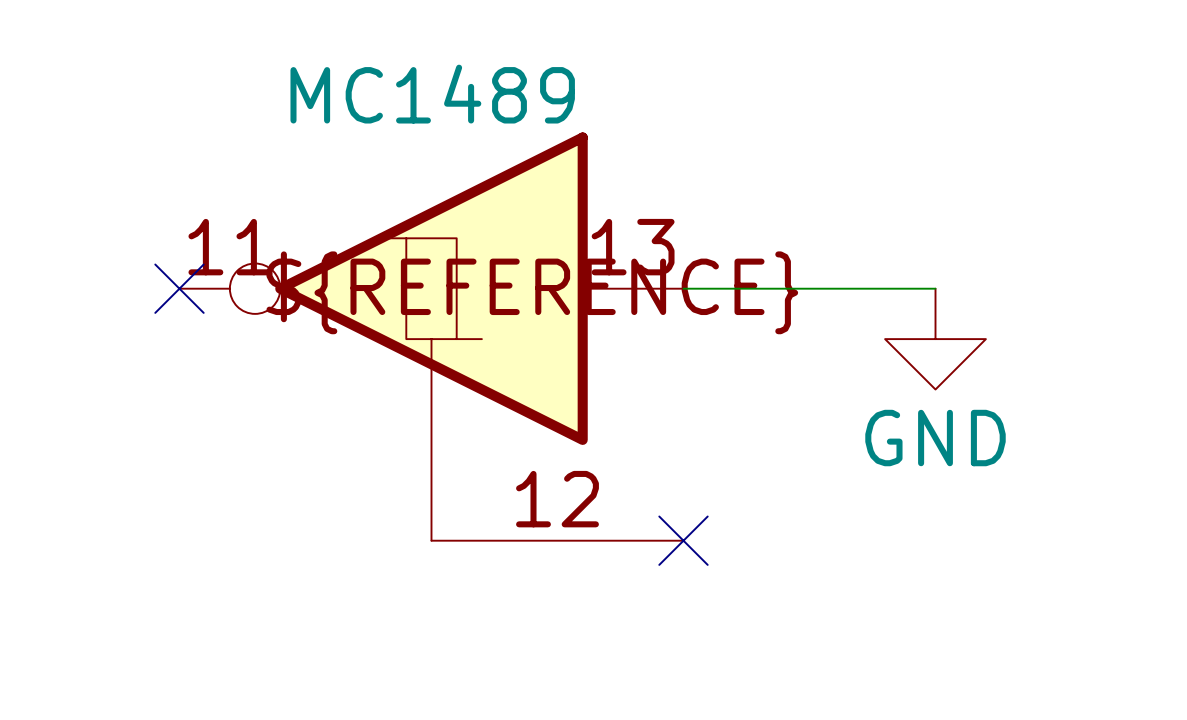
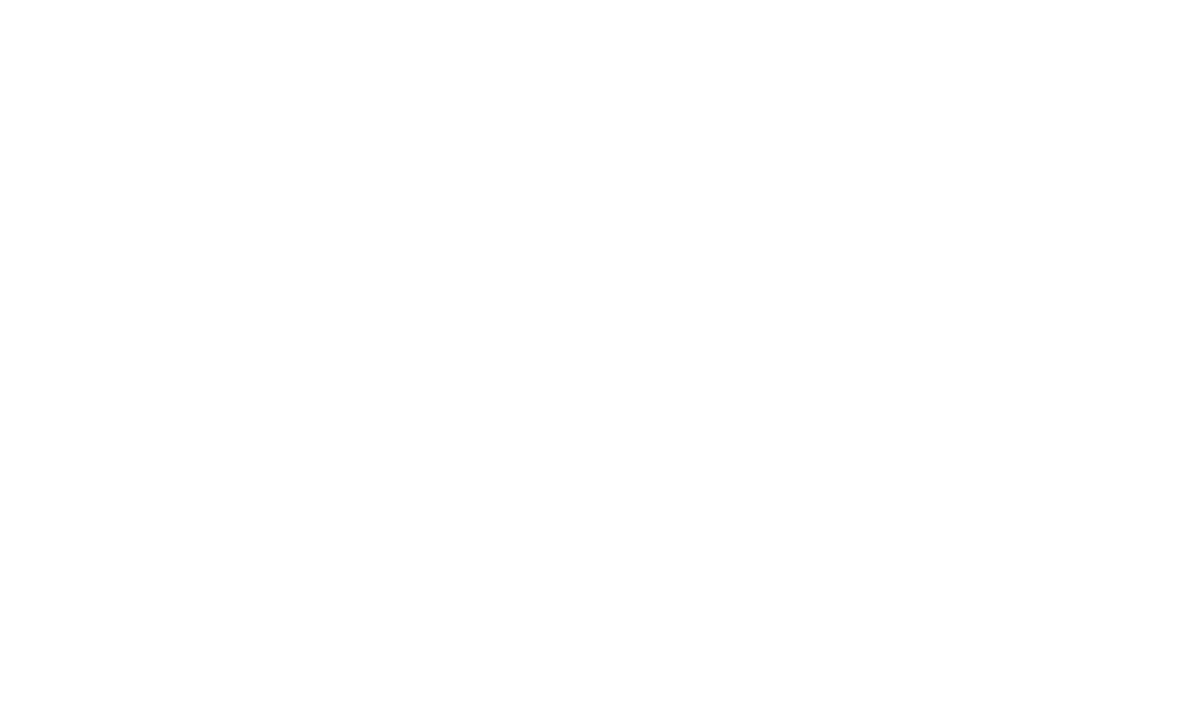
no-connect mark: (179, 288) -> none
wire: (683, 288) (935, 288) -> none
part: MC1489 (431, 336) -> none
power symbol: GND (935, 339) -> none
no-connect mark: (683, 540) -> none

